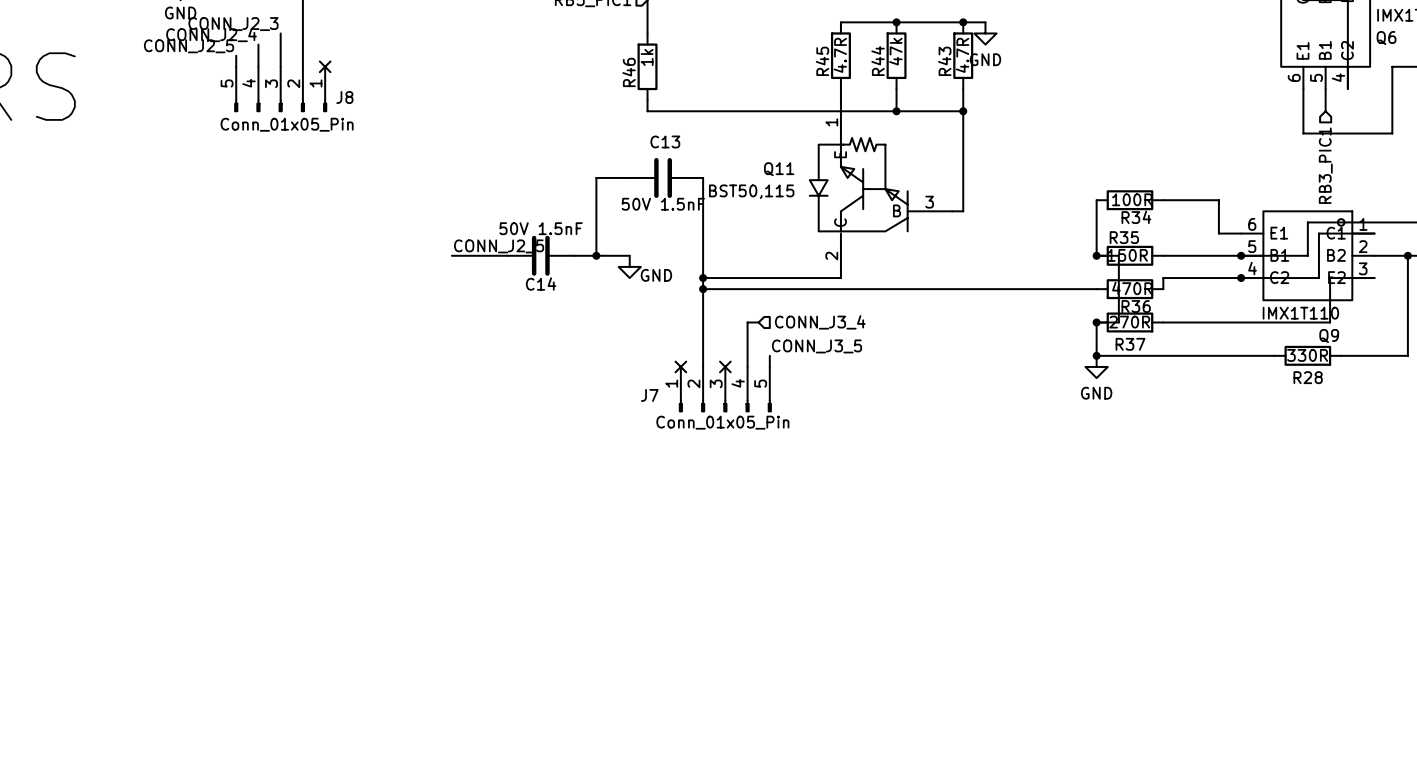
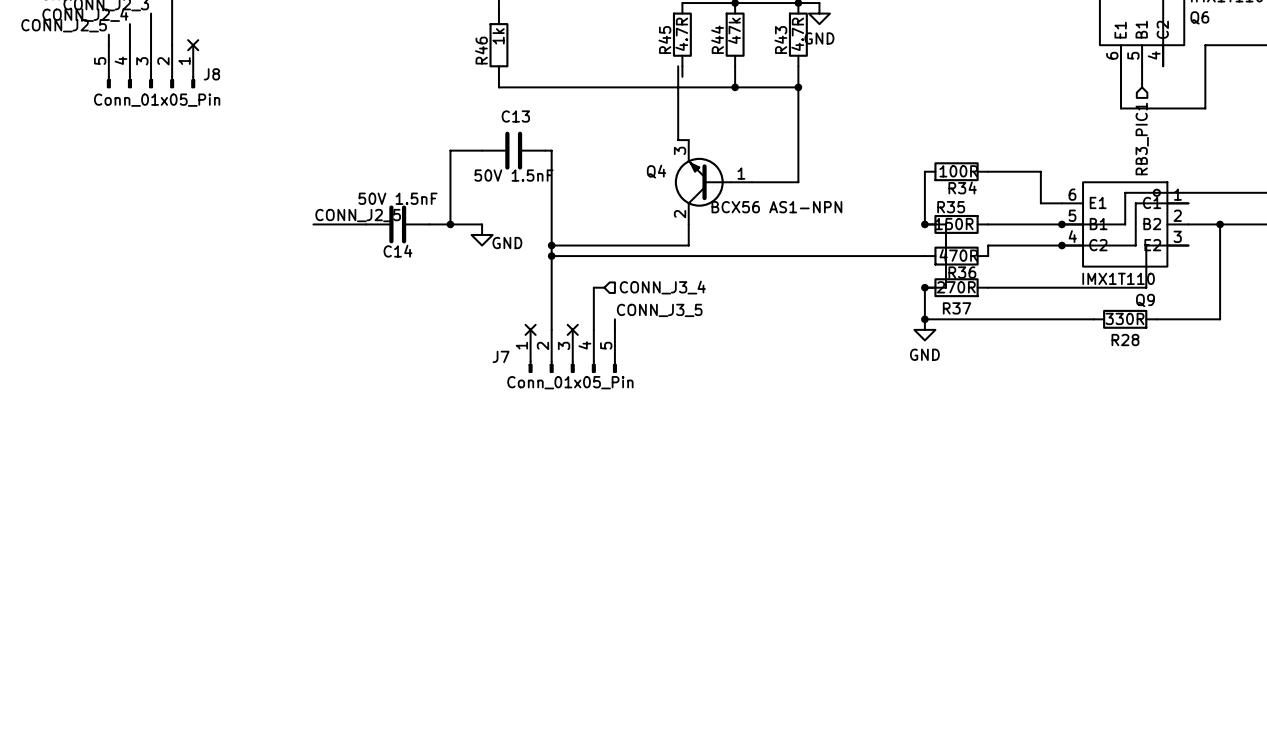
wire: none -> (678, 66) (678, 140) (688, 140)
Q11: BST50,115 (880, 189) -> none
Q4: none -> BCX56 AS1-NPN (713, 182)
wire: none -> (688, 224) (688, 245) (682, 245)

